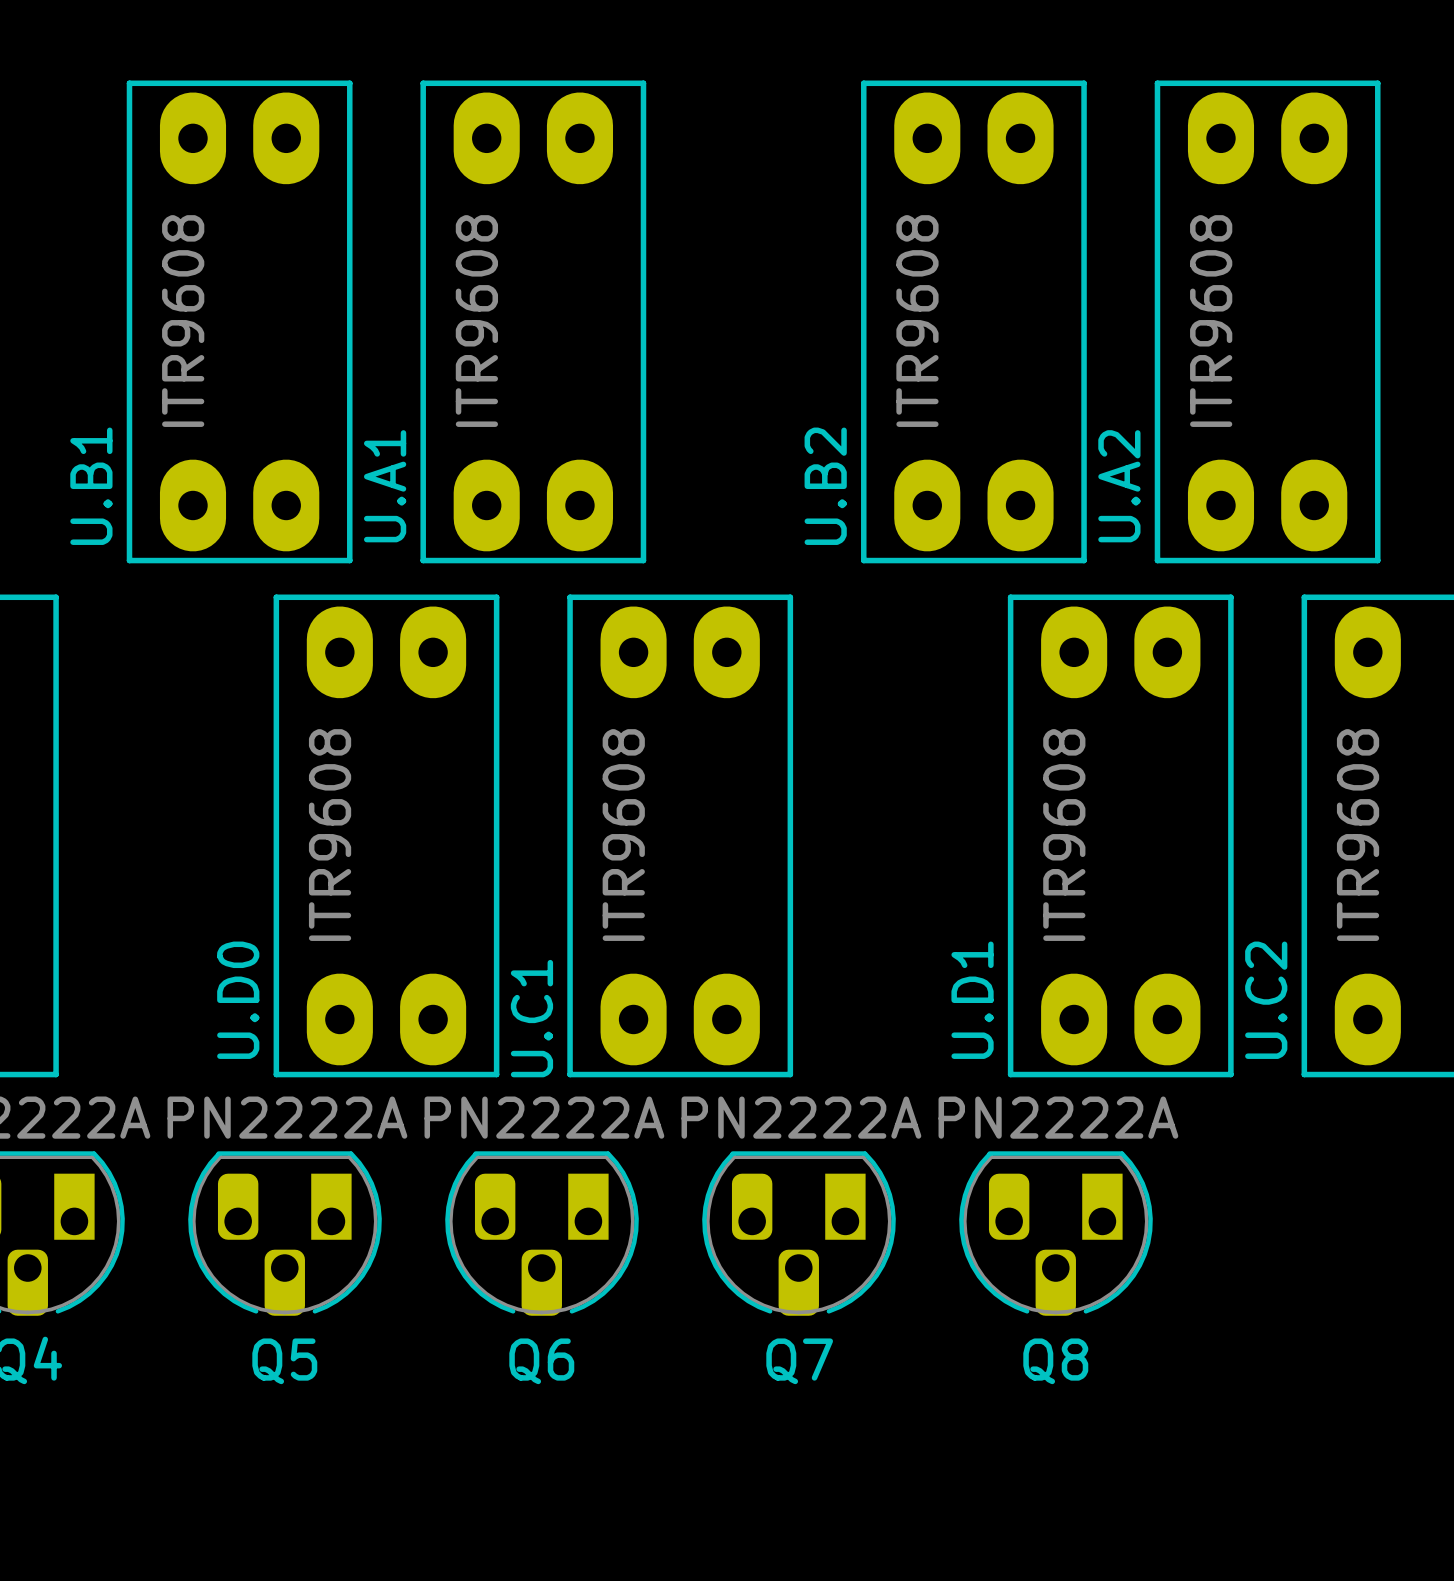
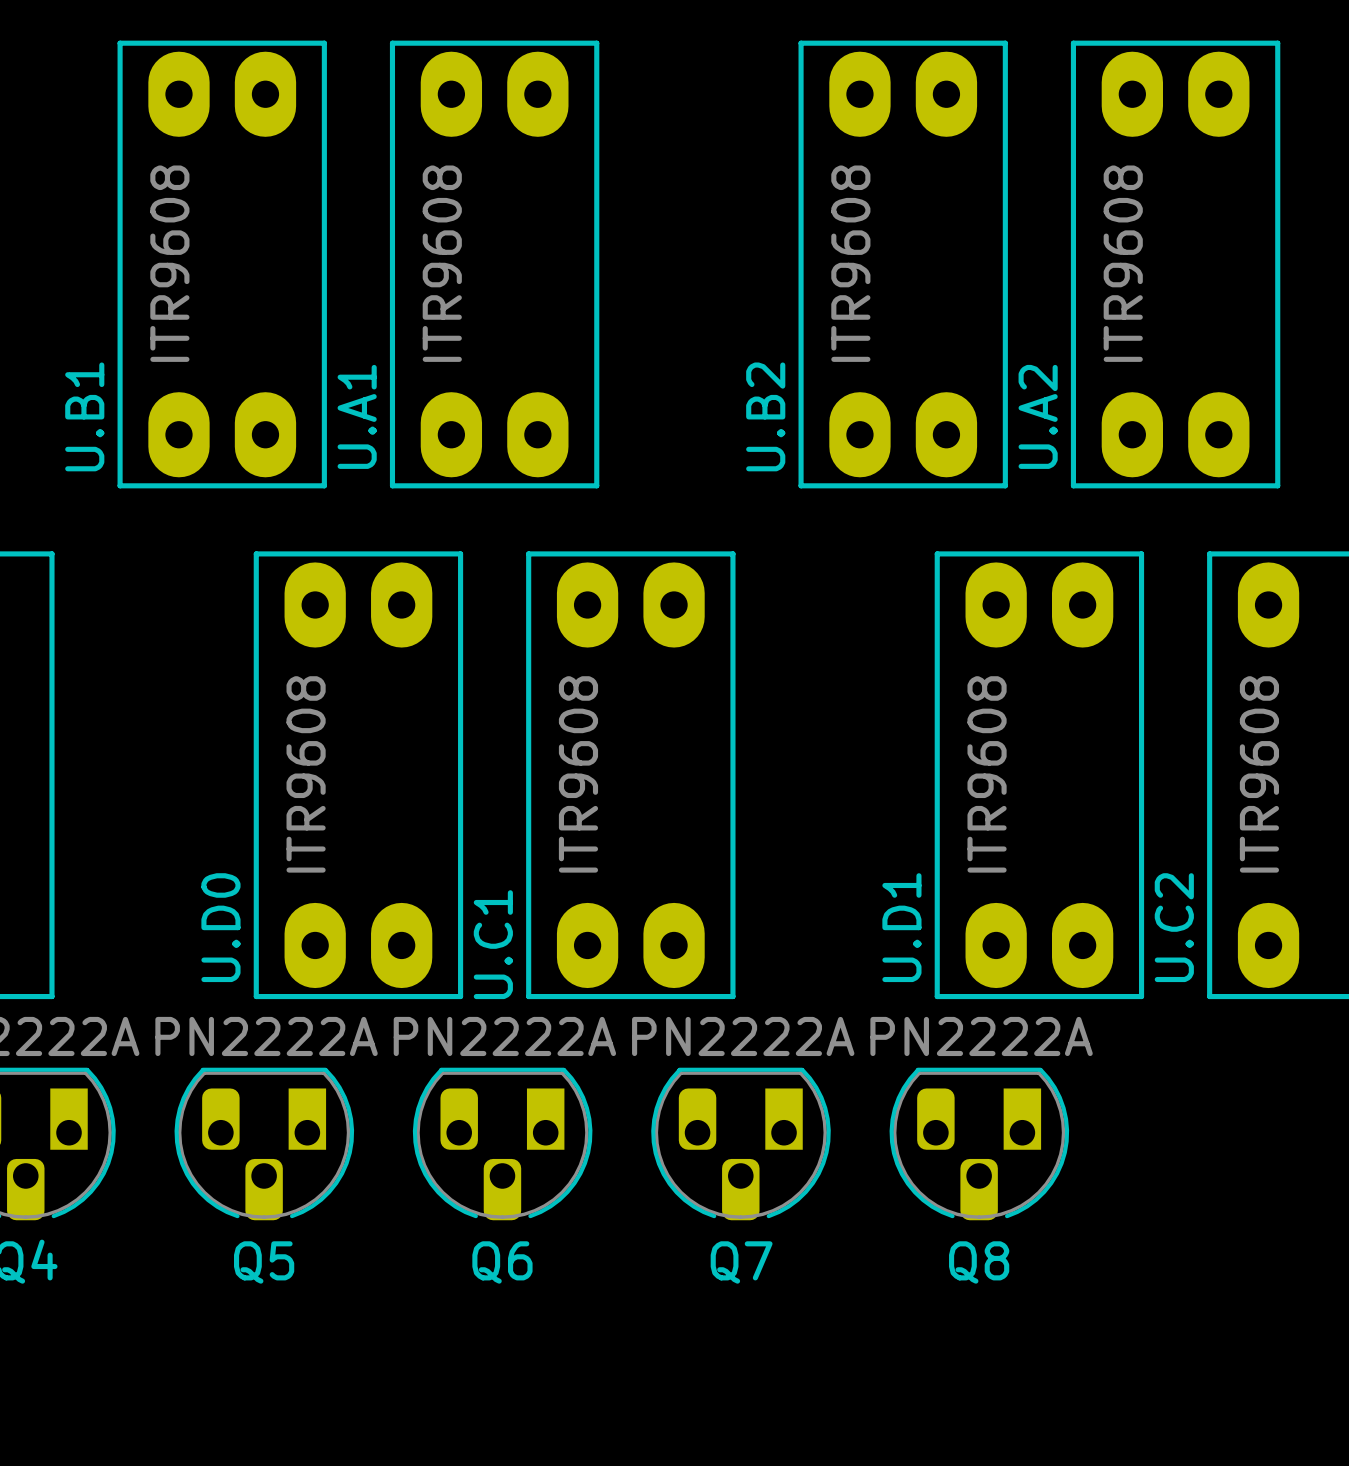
U.B1 position: (239, 321) -> (222, 264)
U.A1 position: (533, 321) -> (494, 264)
U.B2 position: (973, 321) -> (903, 264)
U.A2 position: (1267, 321) -> (1175, 264)

